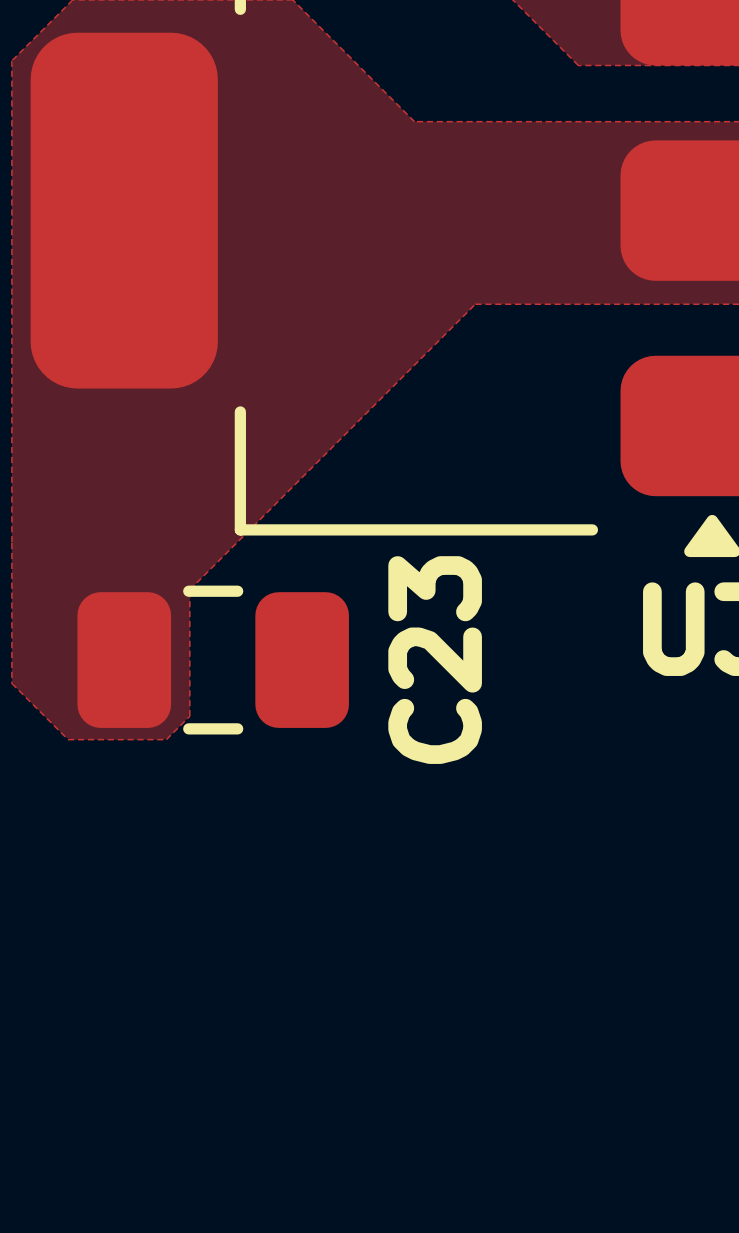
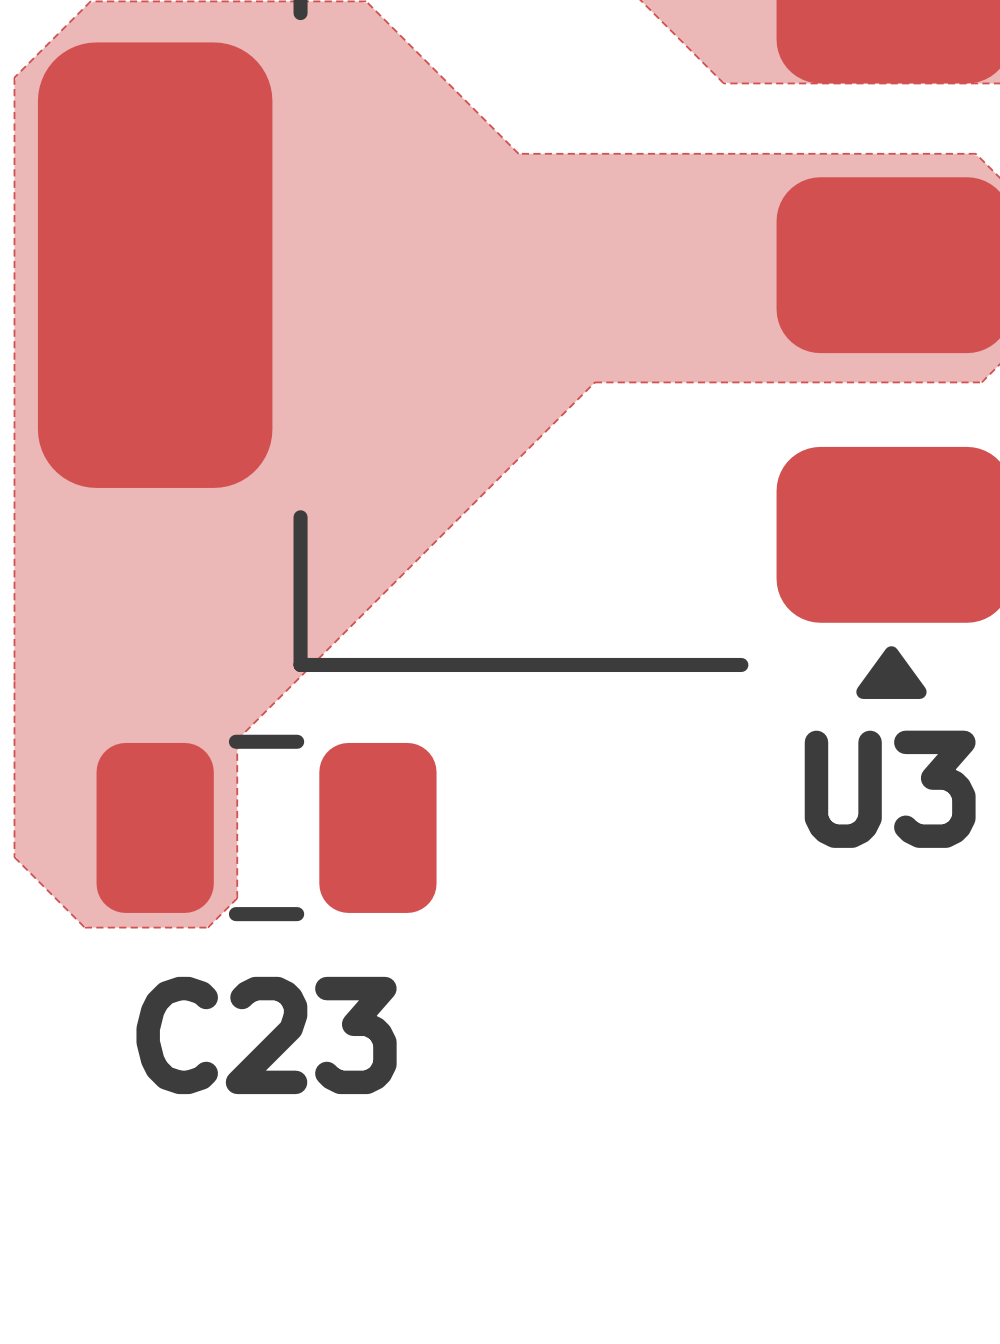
C23 name rotation: 0° (435, 660) -> 90° clockwise (266, 1035)
C23 name position: C23 (435, 660) -> C23 (266, 1035)

